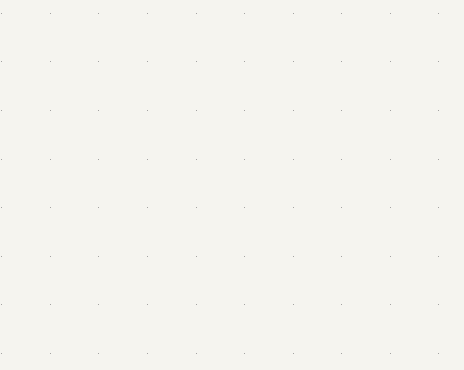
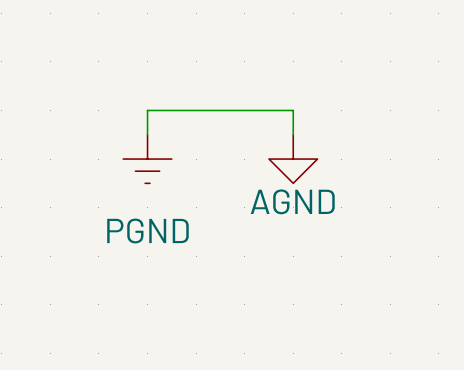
wire: none -> (147, 134) (147, 110) (293, 110) (293, 134)
power symbol: none -> PGND (147, 159)
power symbol: none -> AGND (293, 159)

